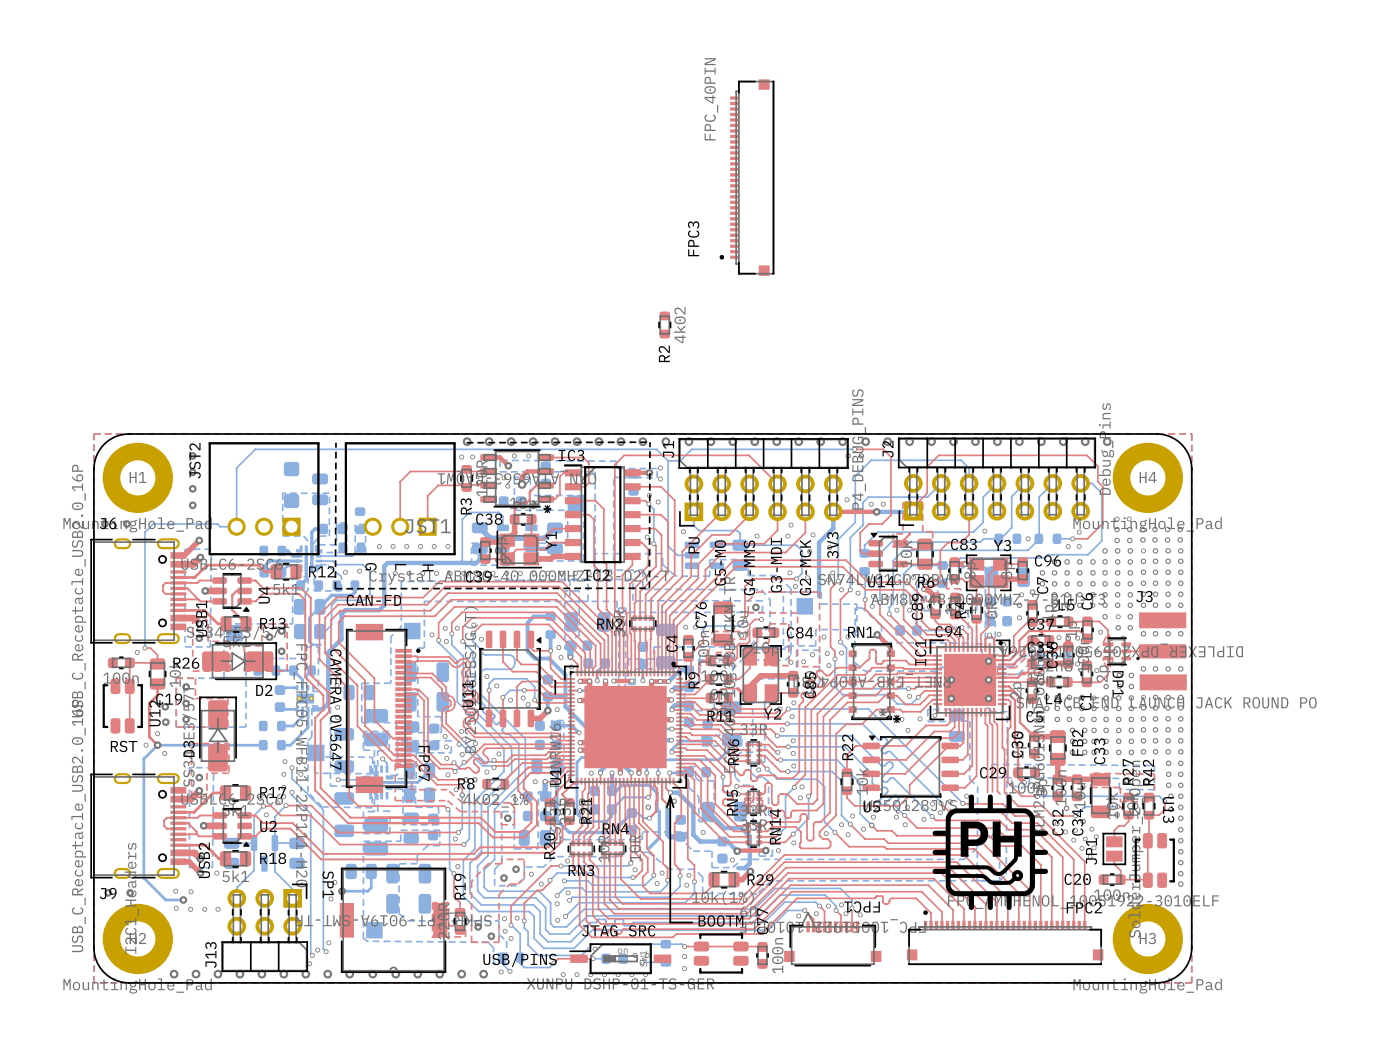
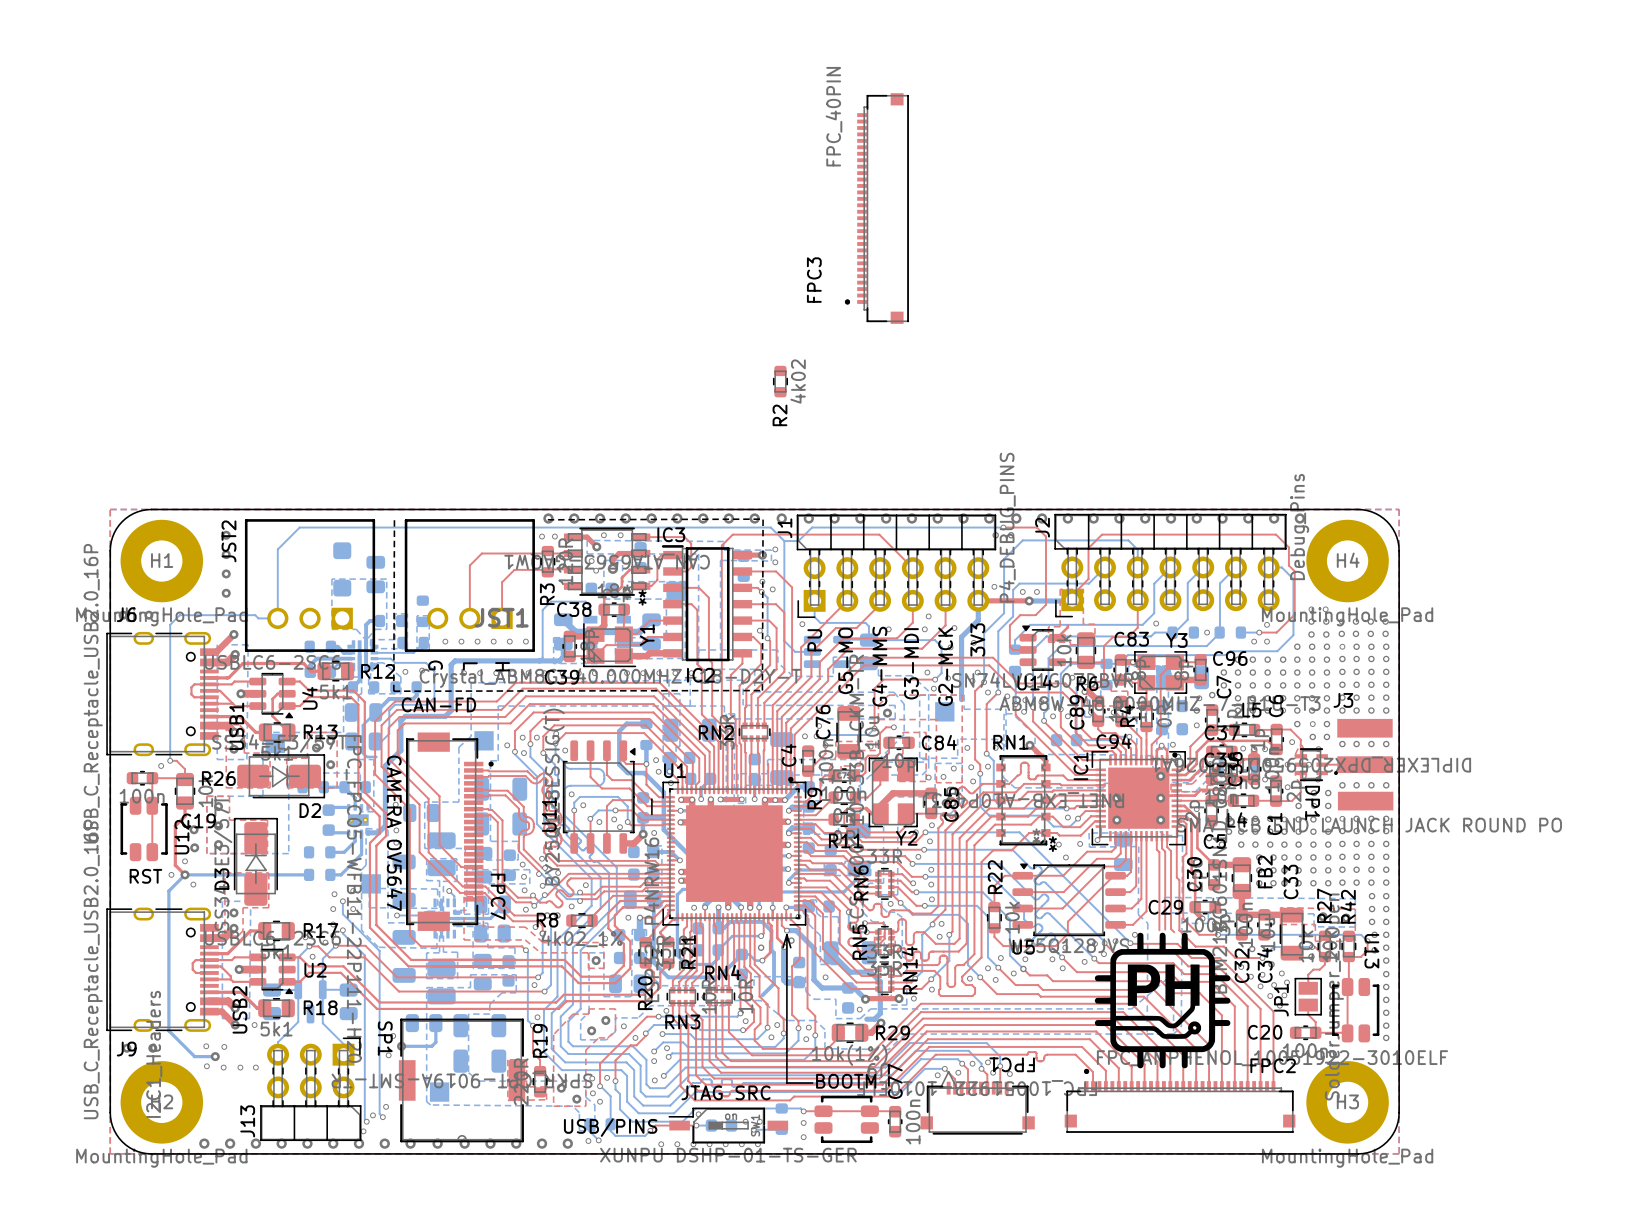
U1 name rotation: 0° (555, 776) -> 90° clockwise (675, 770)
U1 name position: U1 (555, 776) -> U1 (675, 770)

